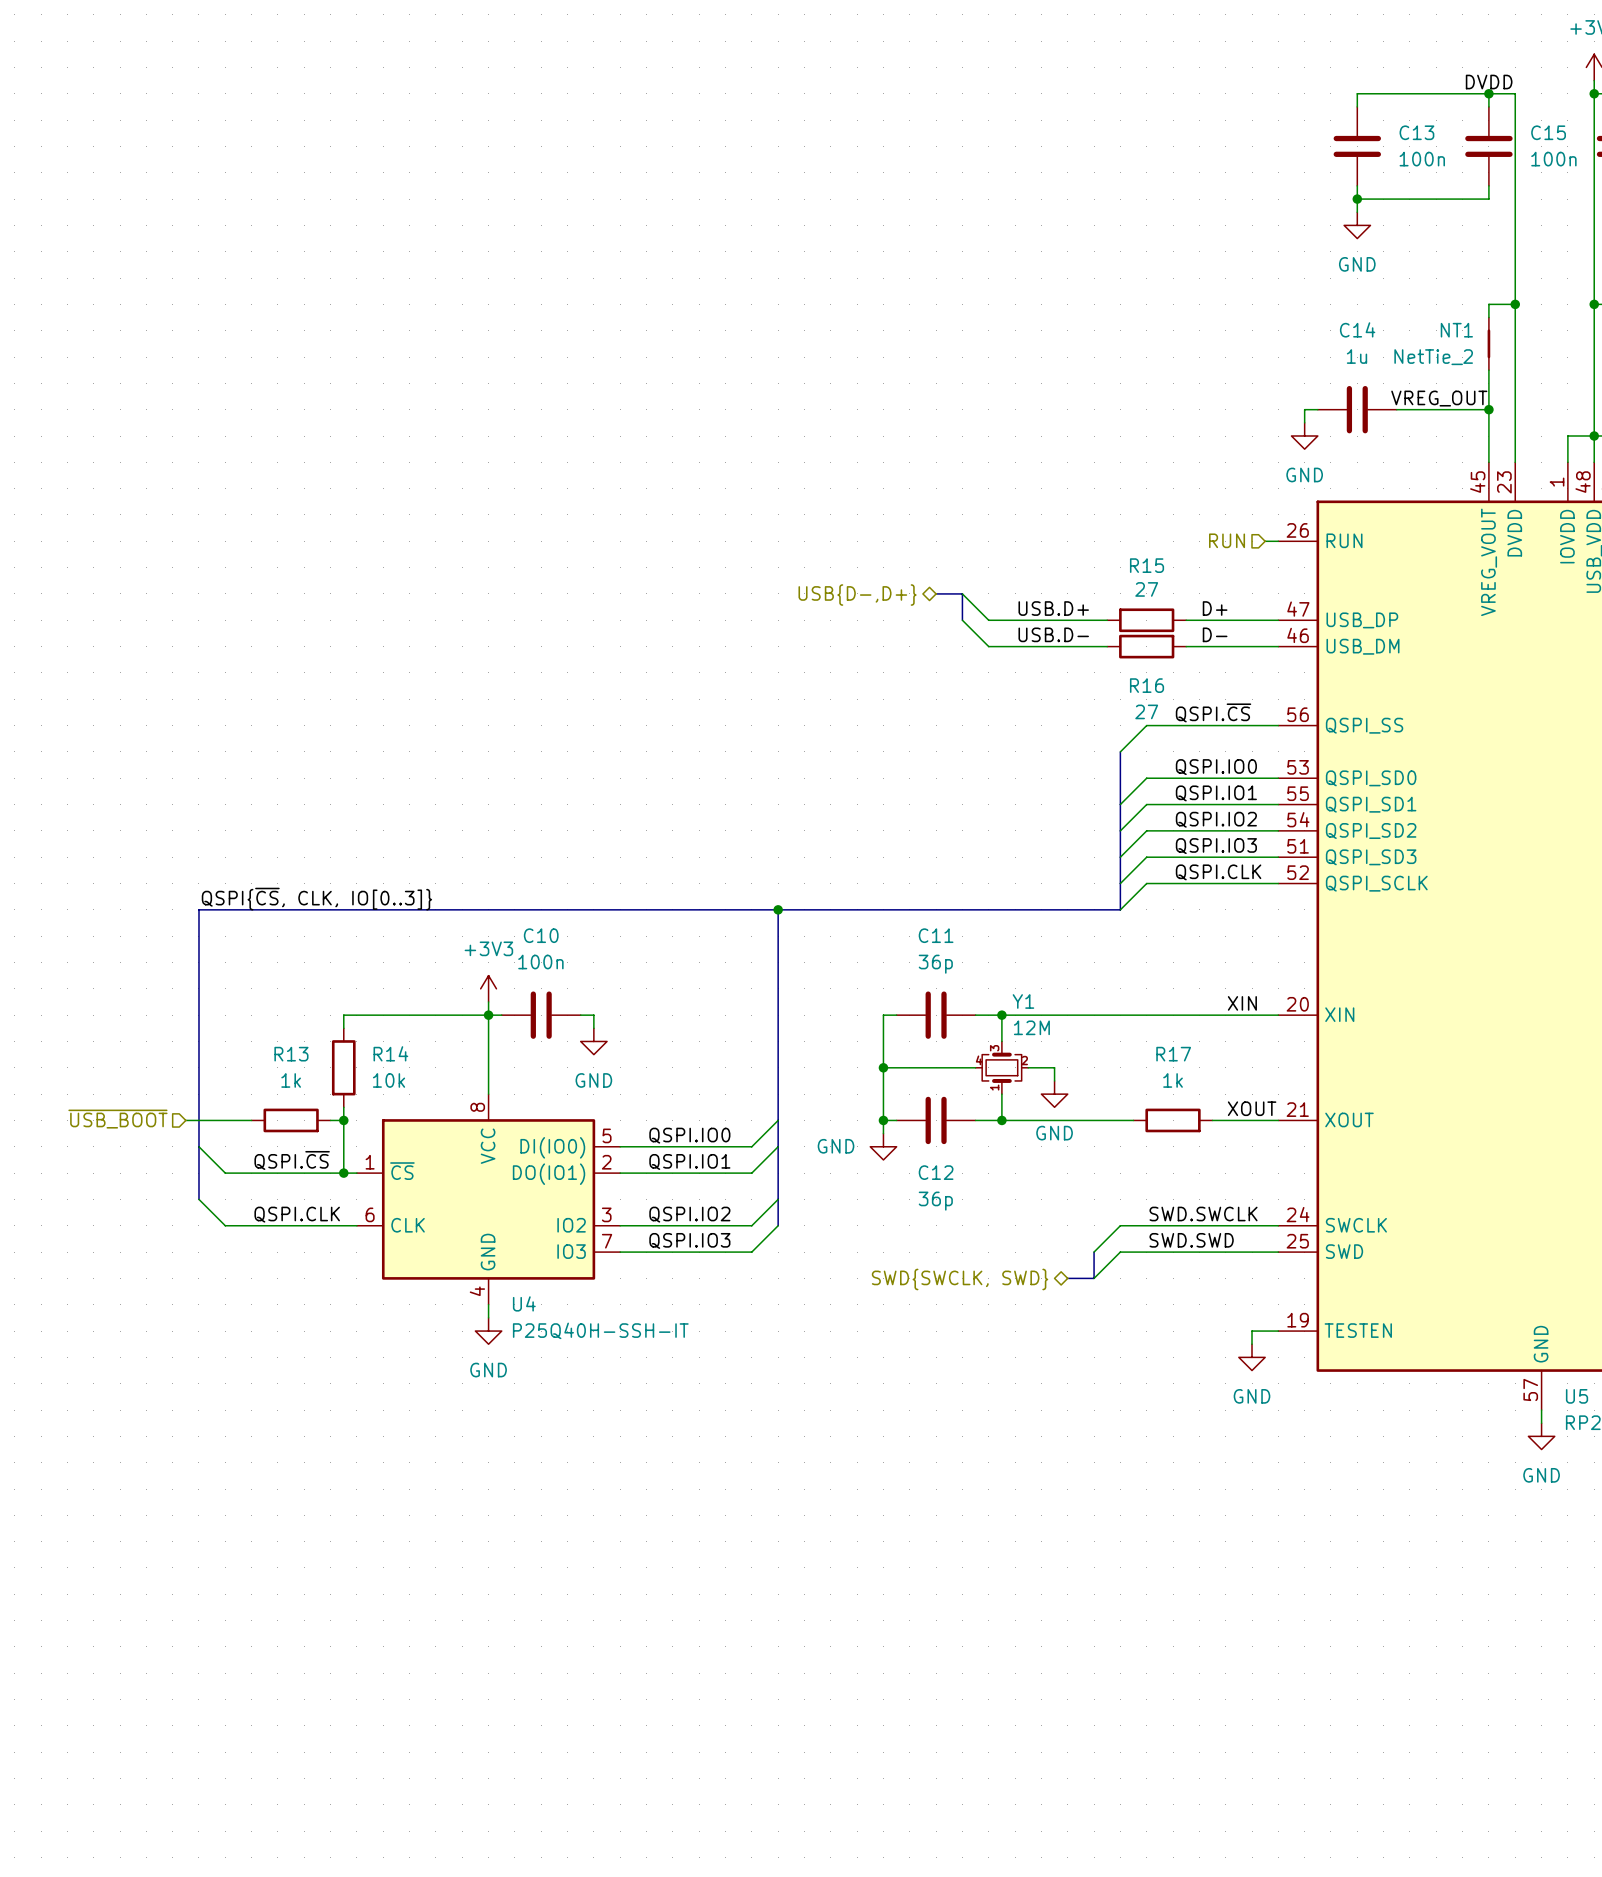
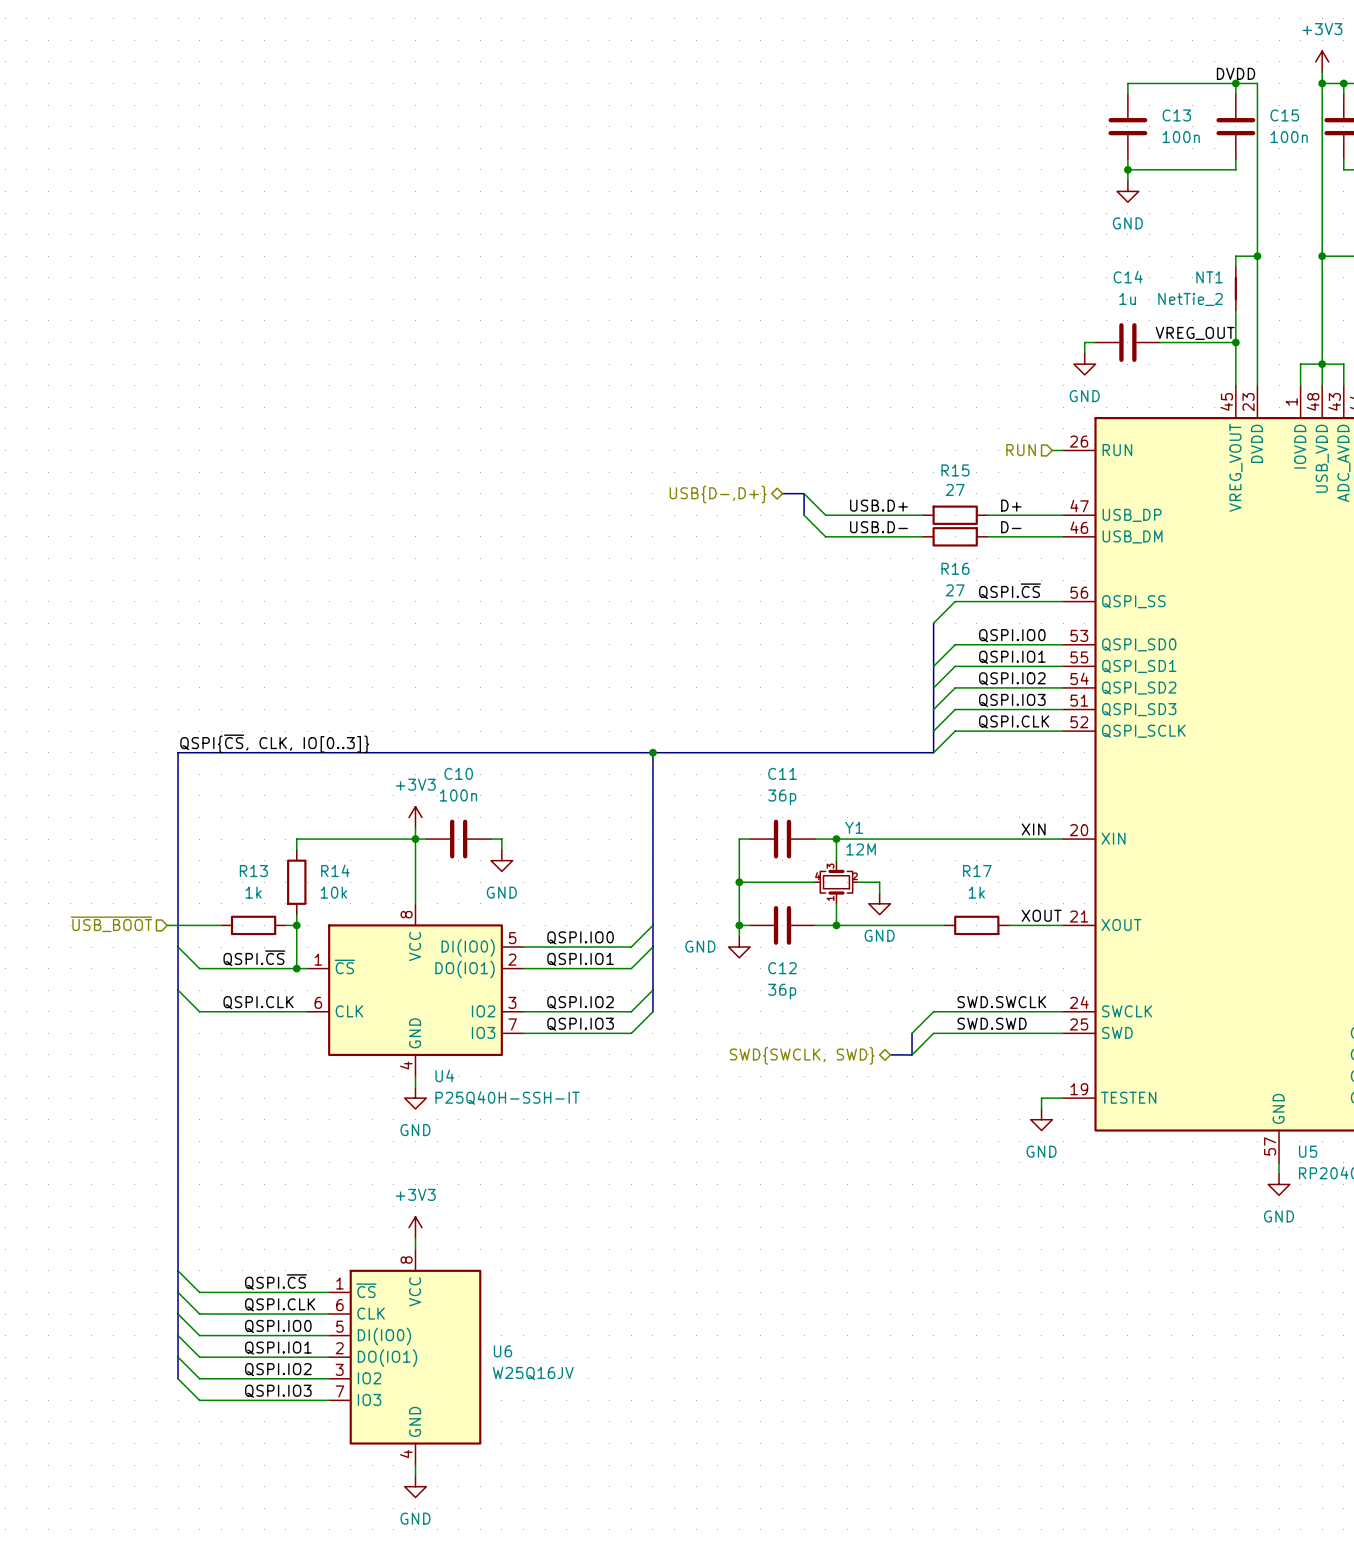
bus: none -> (178, 990) (178, 1378)
power symbol: none -> +3V3 (415, 1227)
wire: none -> (415, 1238) (415, 1249)
wire: none -> (178, 1270) (199, 1292) (329, 1292)
label: none -> QSPI.~{CS} (276, 1282)
wire: none -> (178, 1292) (199, 1314) (329, 1314)
label: none -> QSPI.CLK (280, 1304)
wire: none -> (178, 1314) (199, 1335) (329, 1335)
label: none -> QSPI.IO0 (278, 1326)
wire: none -> (178, 1335) (199, 1357) (329, 1357)
label: none -> QSPI.IO1 (278, 1348)
wire: none -> (178, 1357) (199, 1378) (329, 1378)
U6: none -> W25Q16JV (405, 1357)
label: none -> QSPI.IO2 (278, 1369)
wire: none -> (178, 1378) (199, 1400) (329, 1400)
label: none -> QSPI.IO3 (278, 1391)
wire: none -> (415, 1465) (415, 1475)
power symbol: none -> GND (415, 1486)

